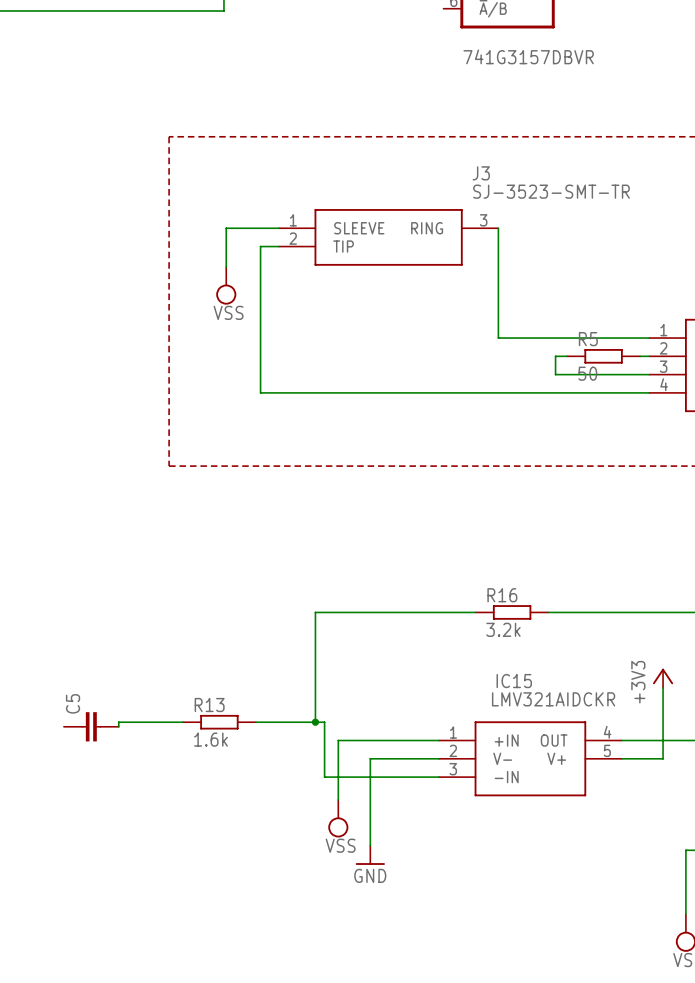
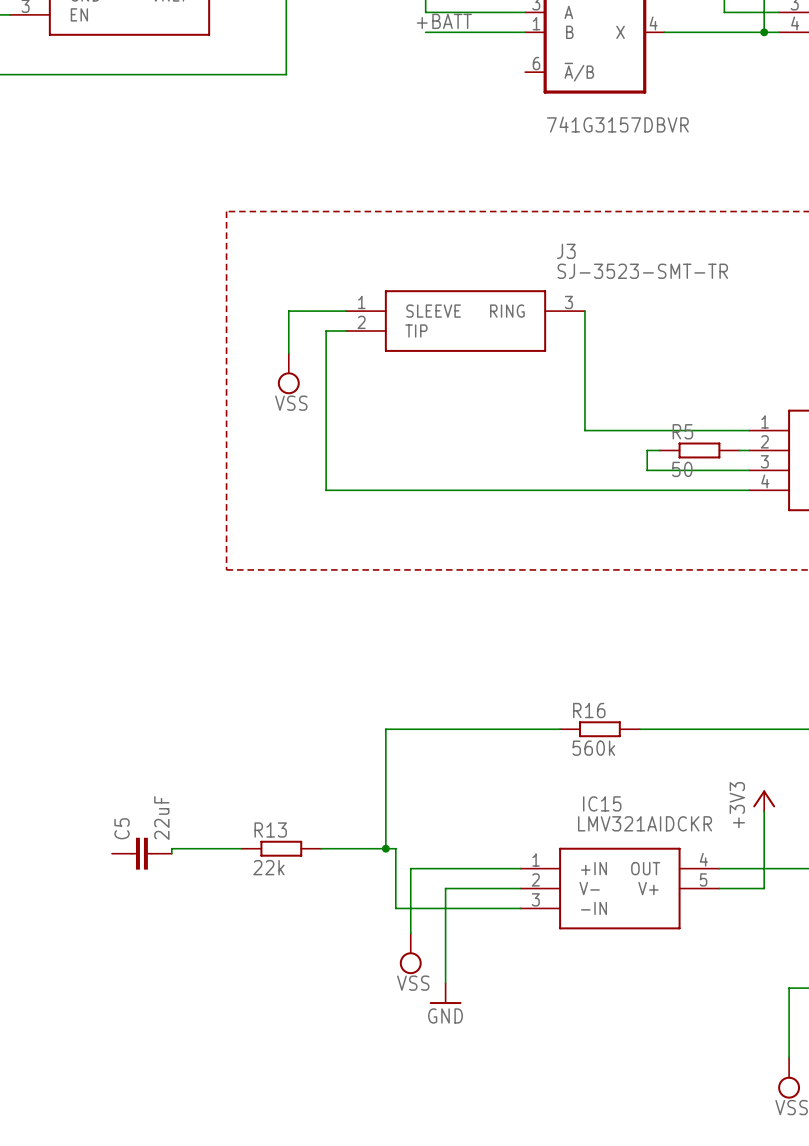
R16 value: 3.2k (503, 629) -> 560k (593, 748)
C5 value: none -> 22uF (161, 818)
R13 value: 1.6k (211, 739) -> 22k (268, 867)

